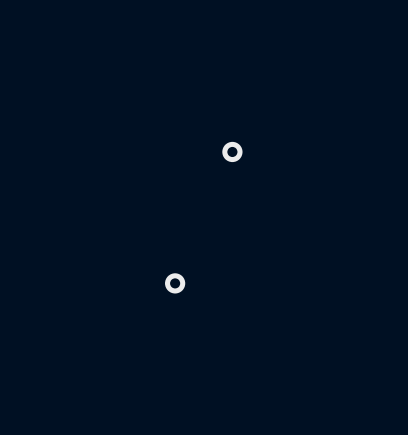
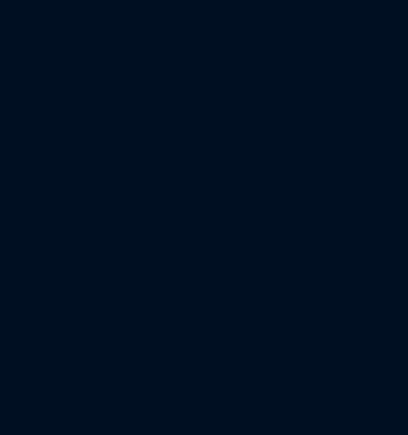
via: (232, 151) -> none
via: (175, 283) -> none

